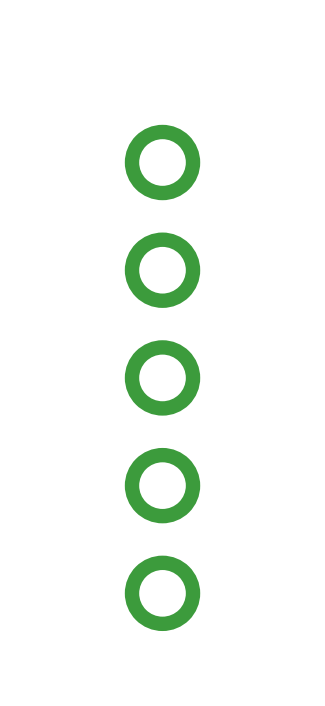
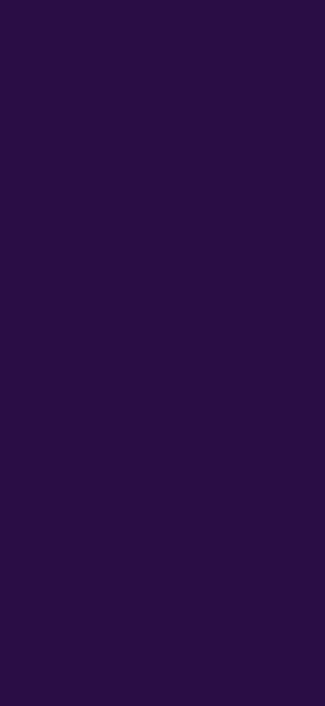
part: (162, 377) -> none

